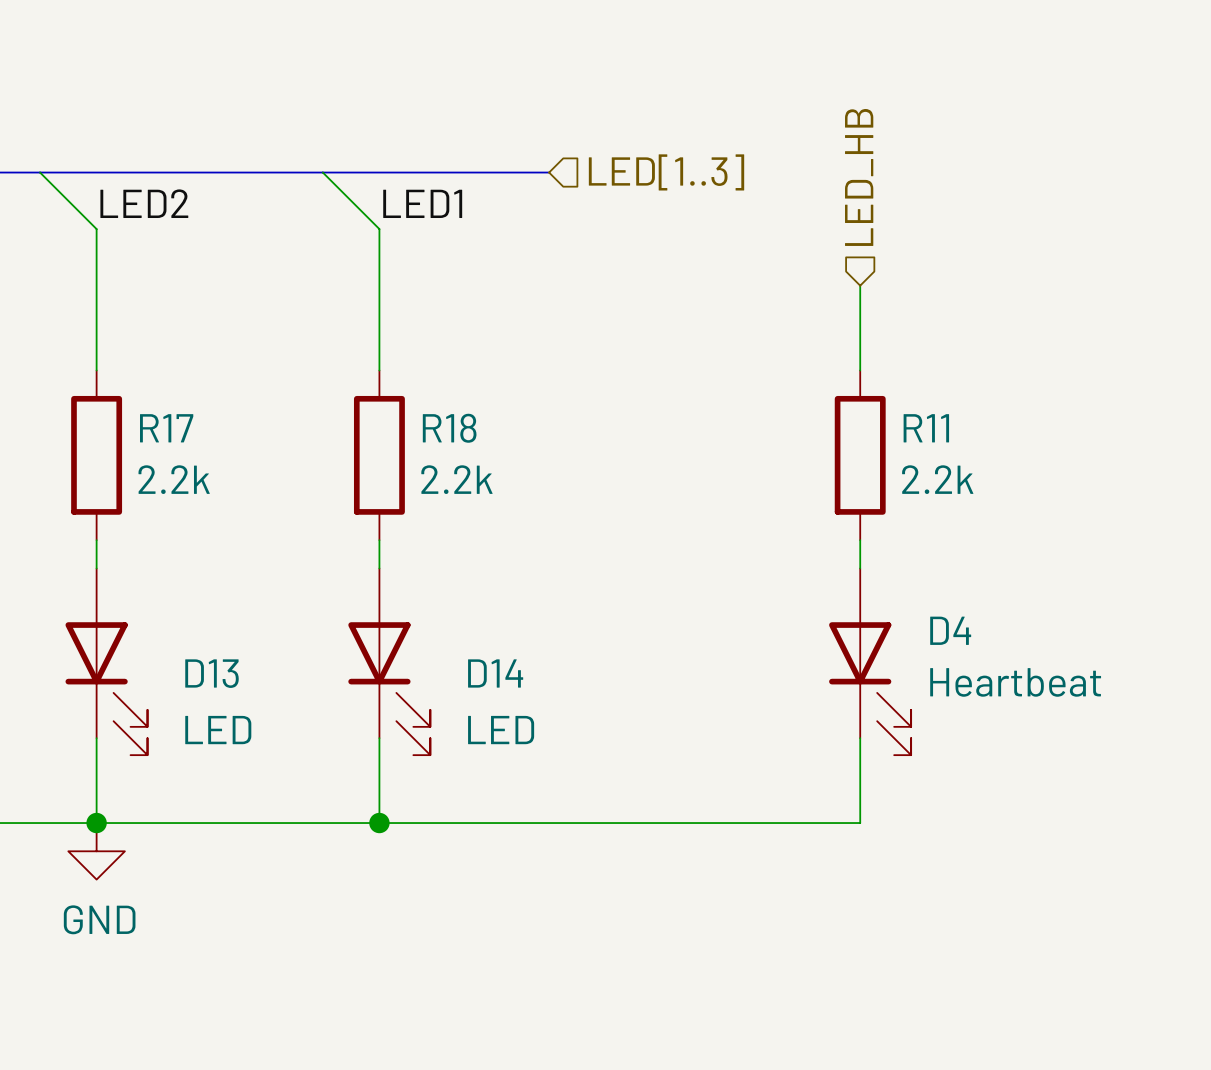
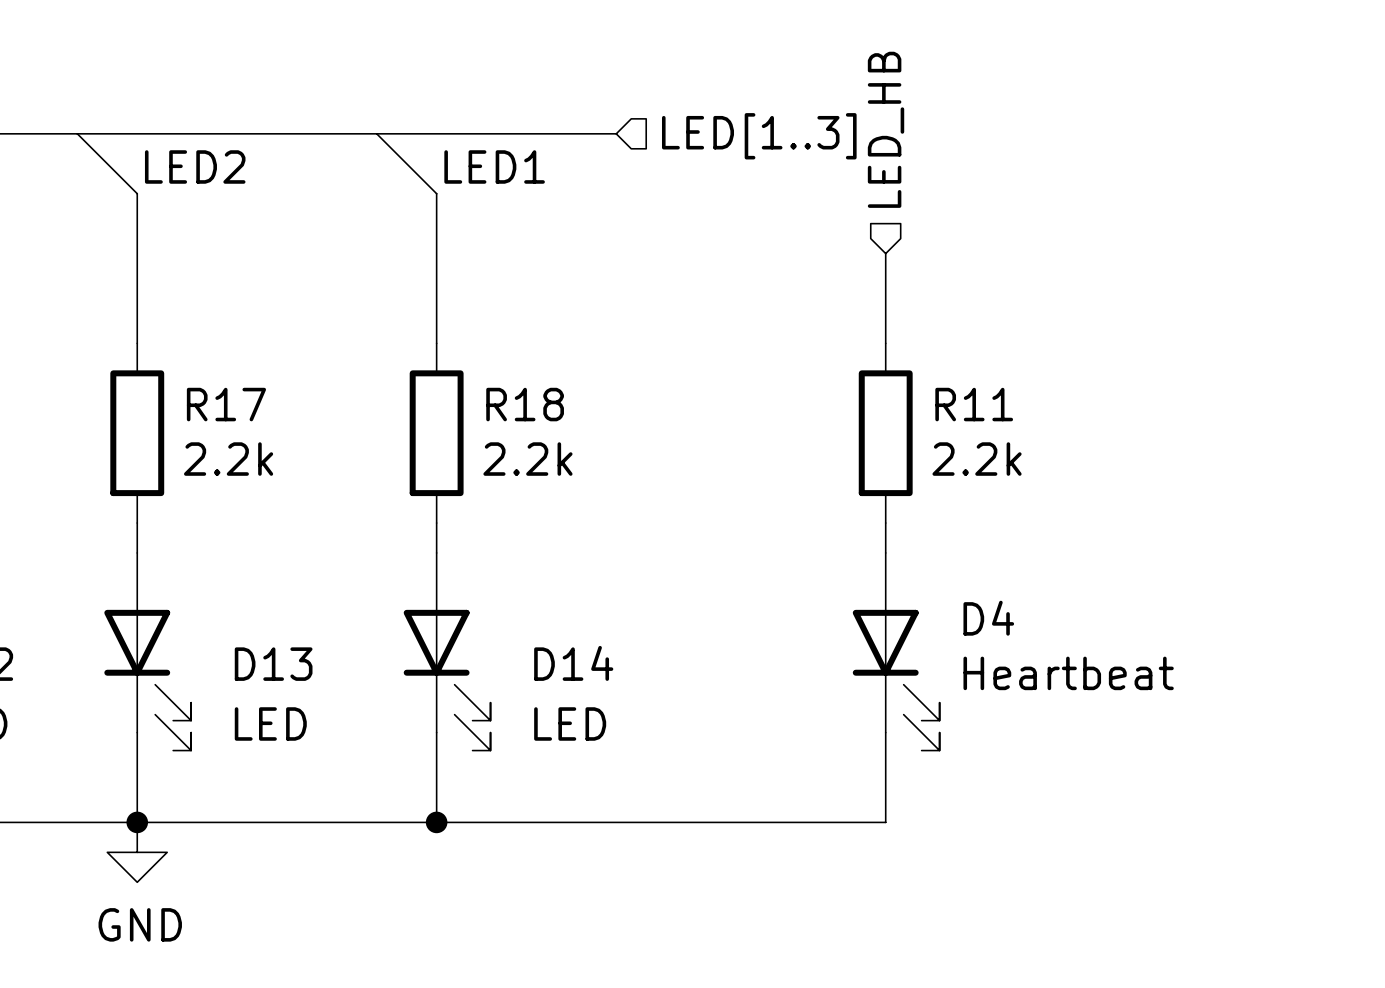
hierarchical label position: LED_HB (859, 177) -> LED_HB (886, 129)
wire: (860, 285) (860, 370) -> (885, 253) (885, 343)
R11 position: (860, 455) -> (885, 433)
wire: (860, 540) (860, 568) -> (885, 523) (885, 552)
D4 position: (870, 661) -> (896, 651)
wire: (860, 738) (860, 823) (803, 823) -> (885, 732) (885, 822)

